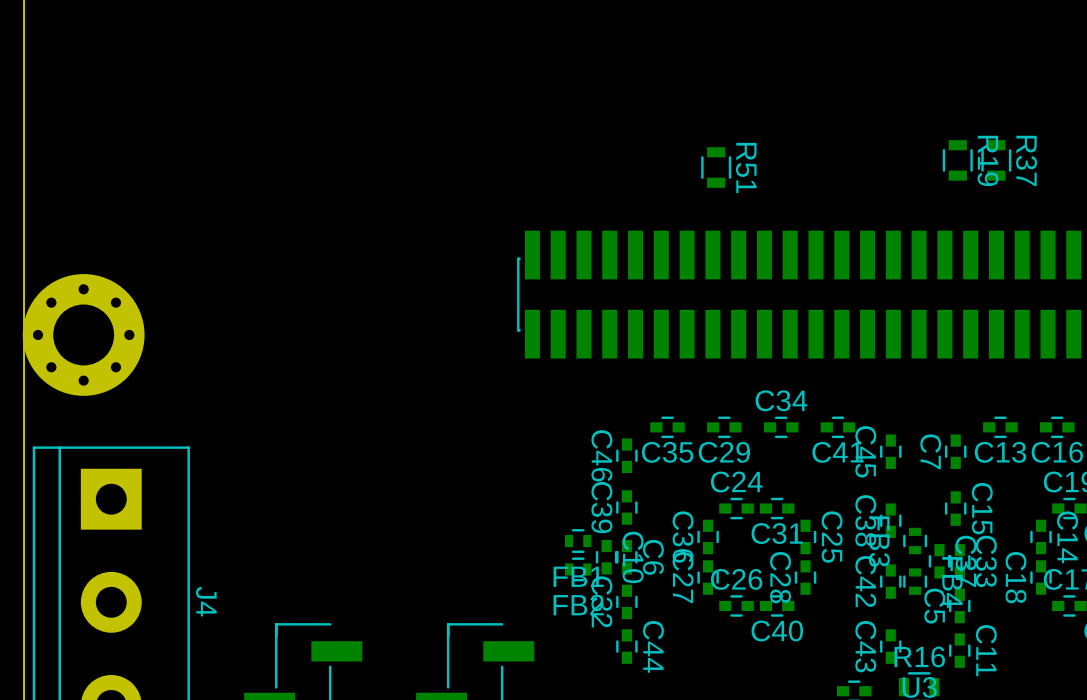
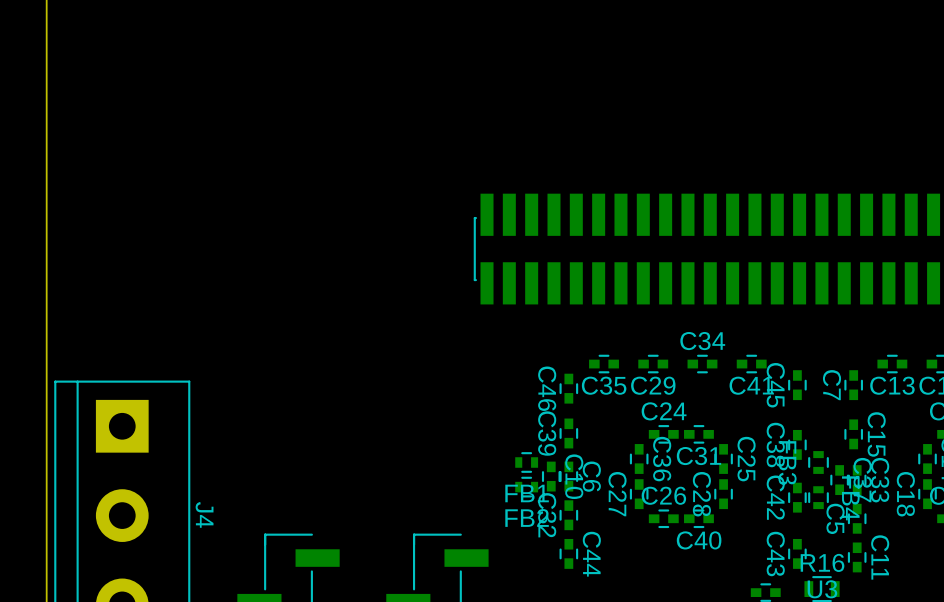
R19: (957, 160) -> none
R37: (996, 160) -> none
R51: (716, 167) -> none
part: (83, 334) -> none
C36 name position: C36 (683, 537) -> C36 (662, 459)

